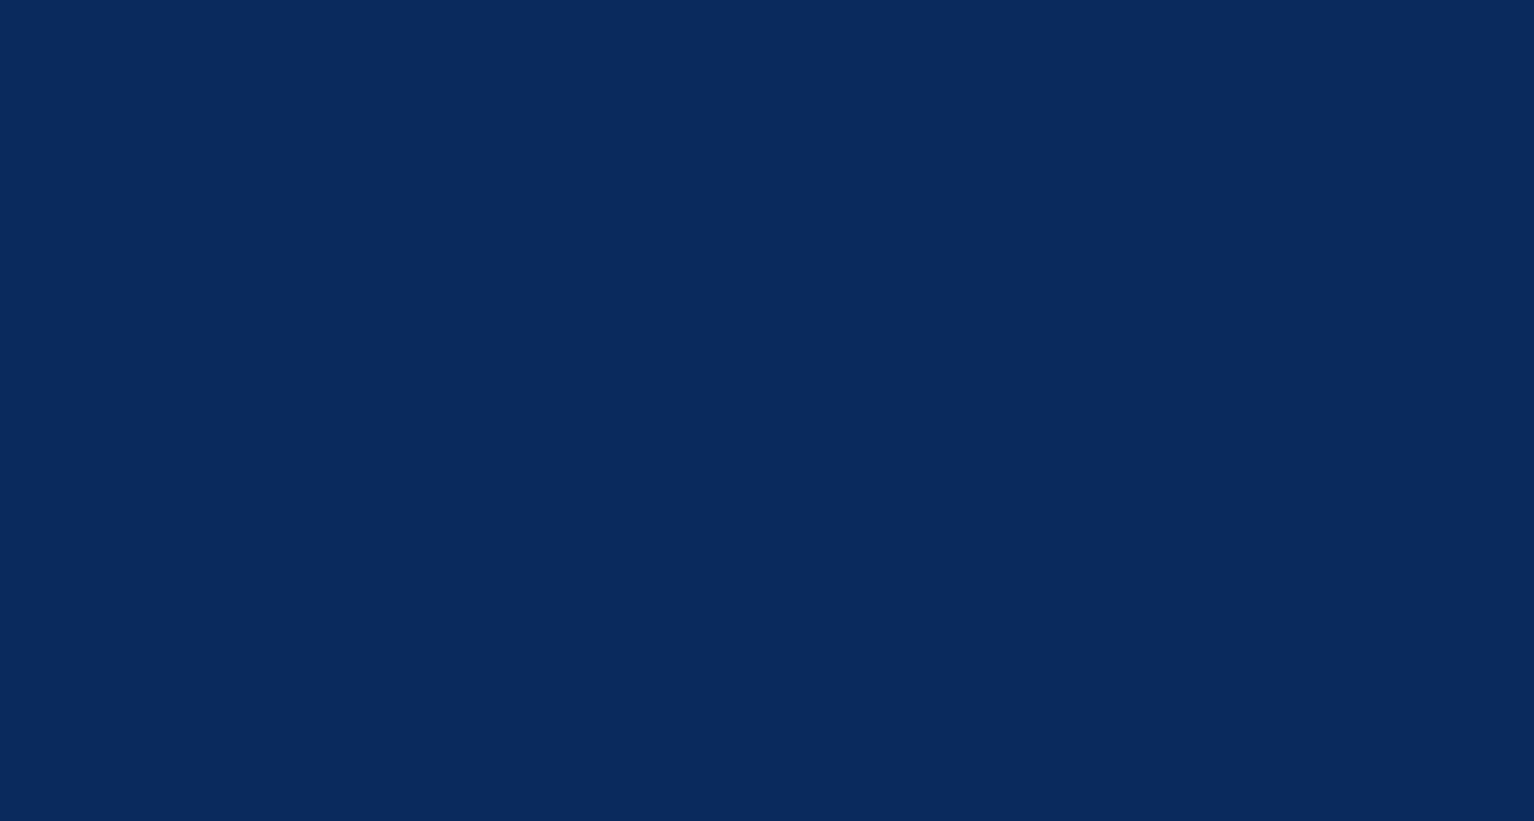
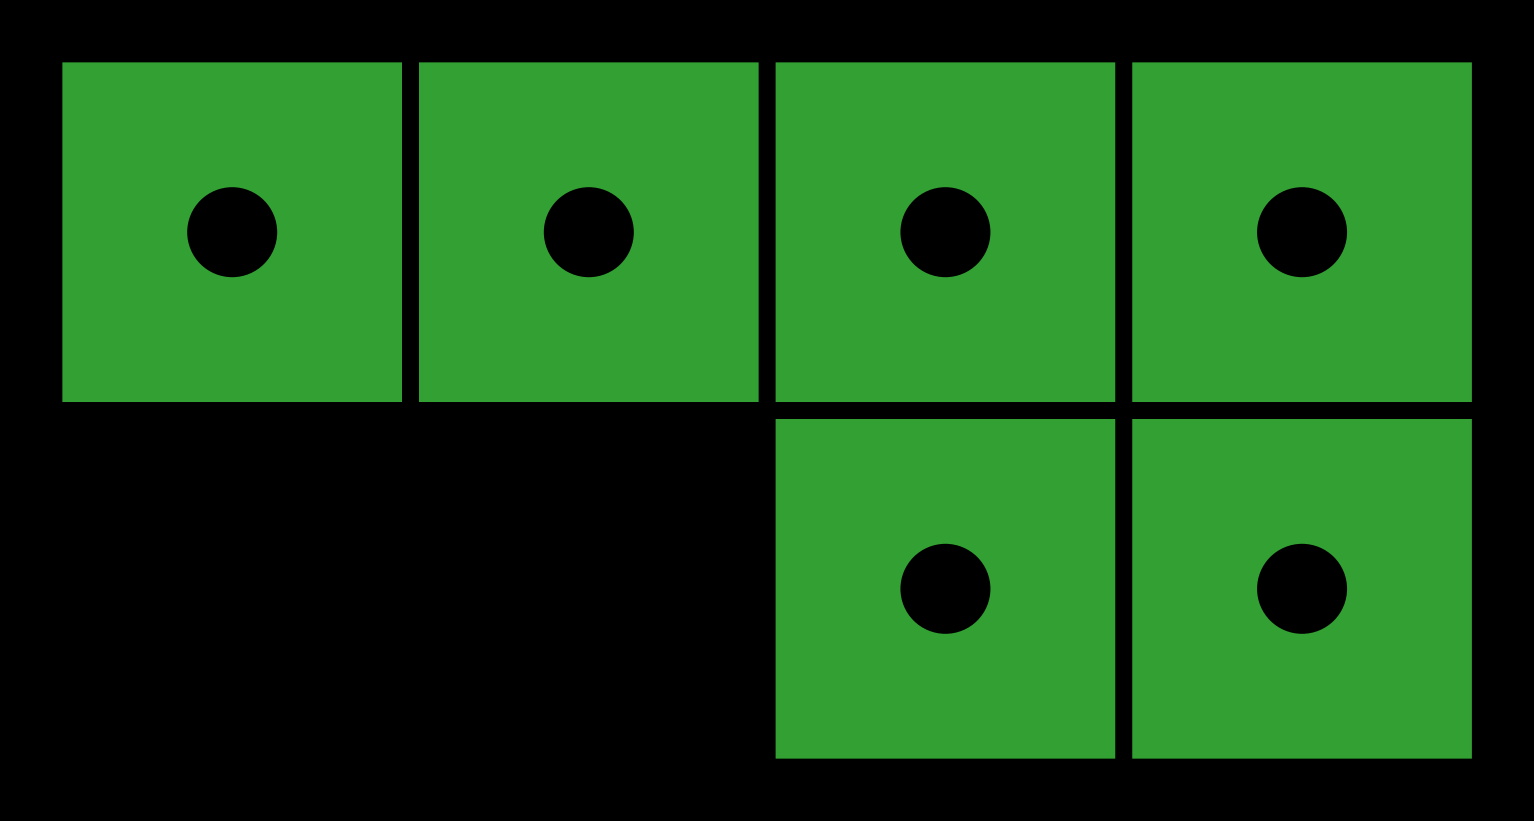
part: none -> (410, 232)
part: none -> (1123, 232)
part: none -> (1123, 588)

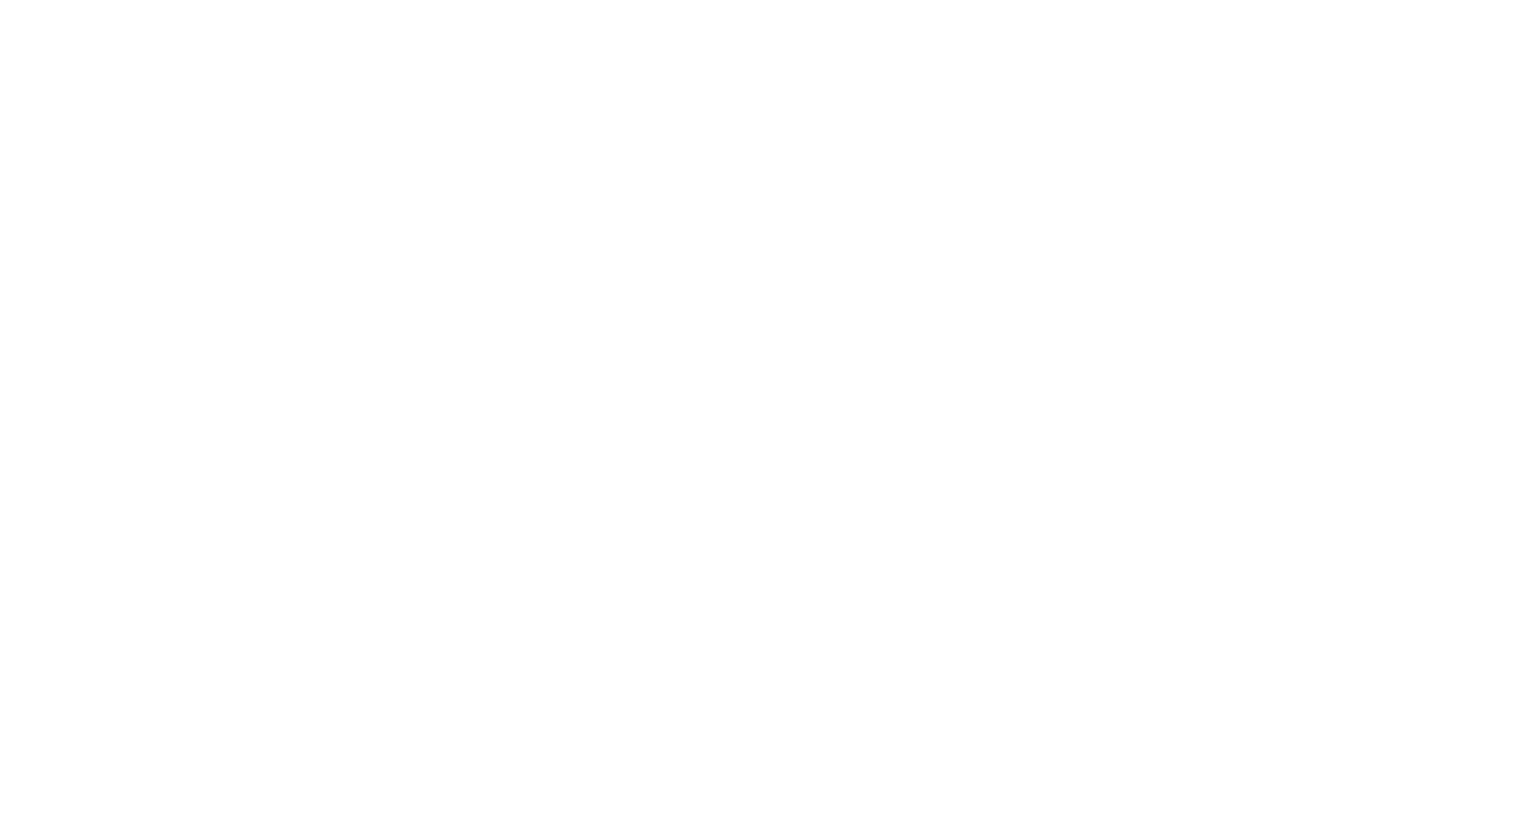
part: (410, 232) -> none
part: (1123, 232) -> none
part: (1123, 588) -> none

